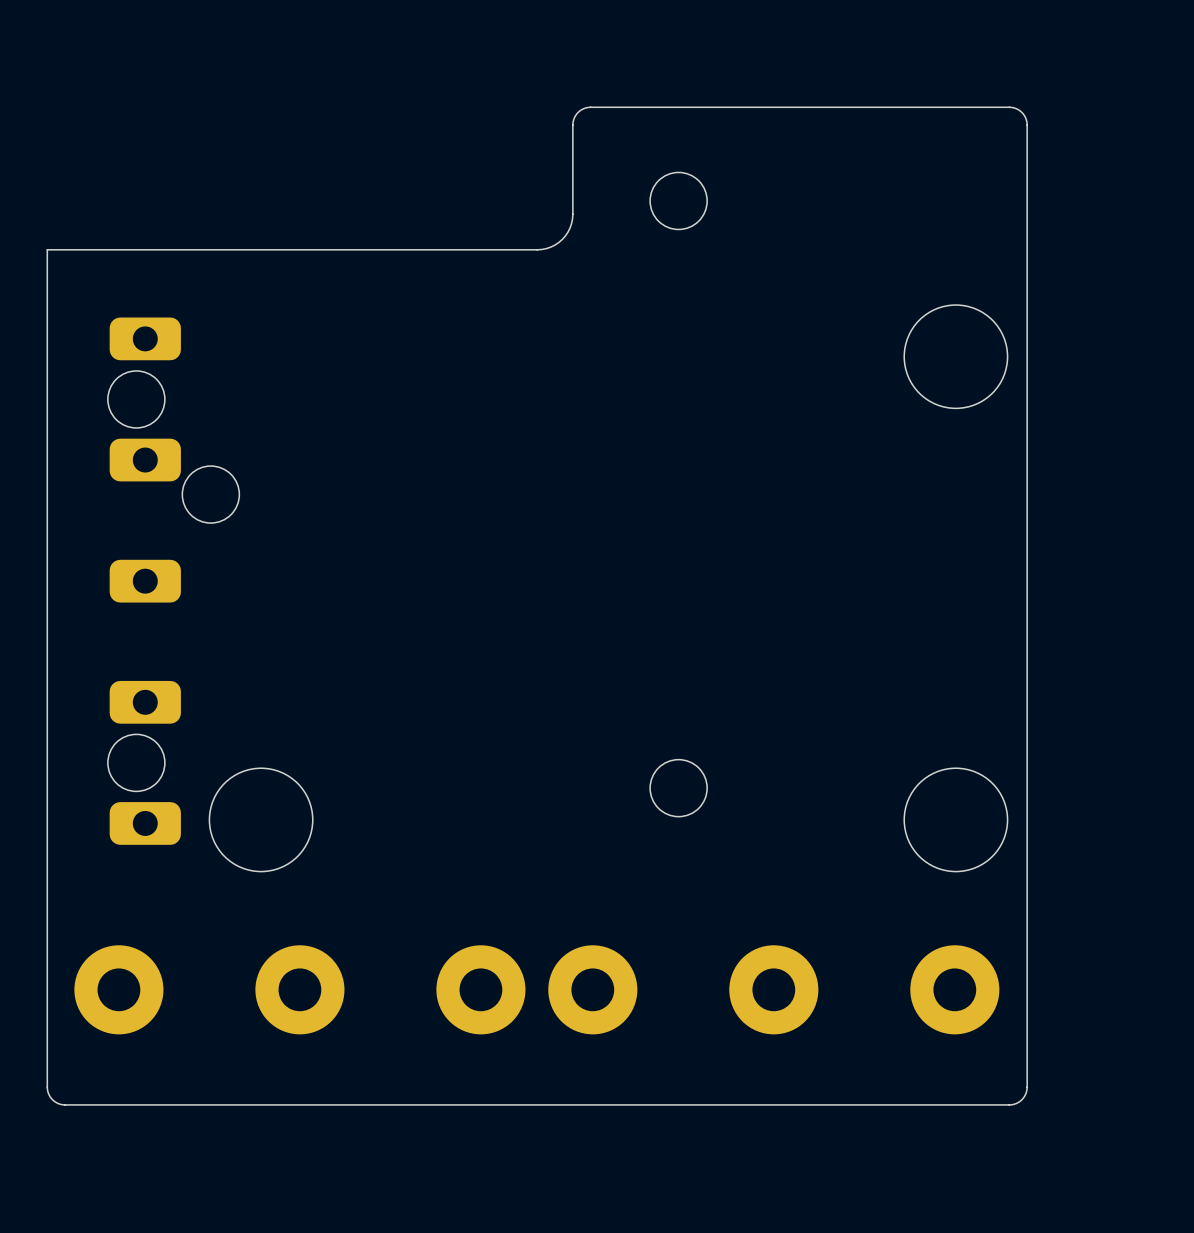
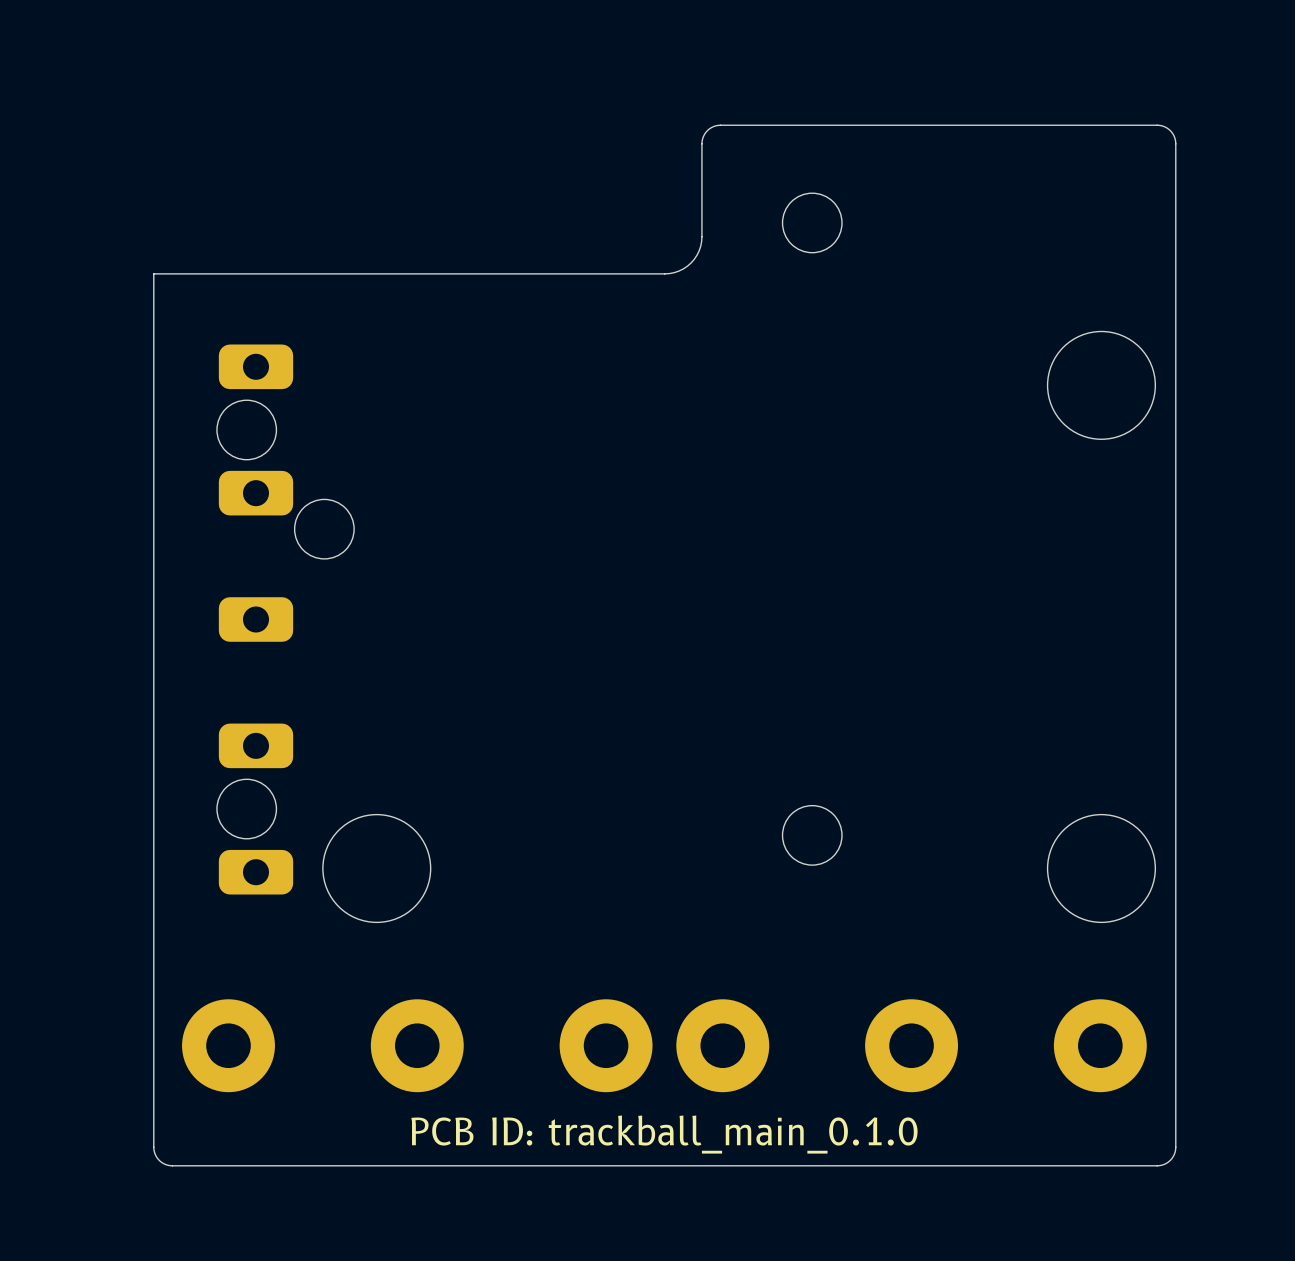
text: none -> PCB ID: trackball_main_0.1.0 (664, 1134)

